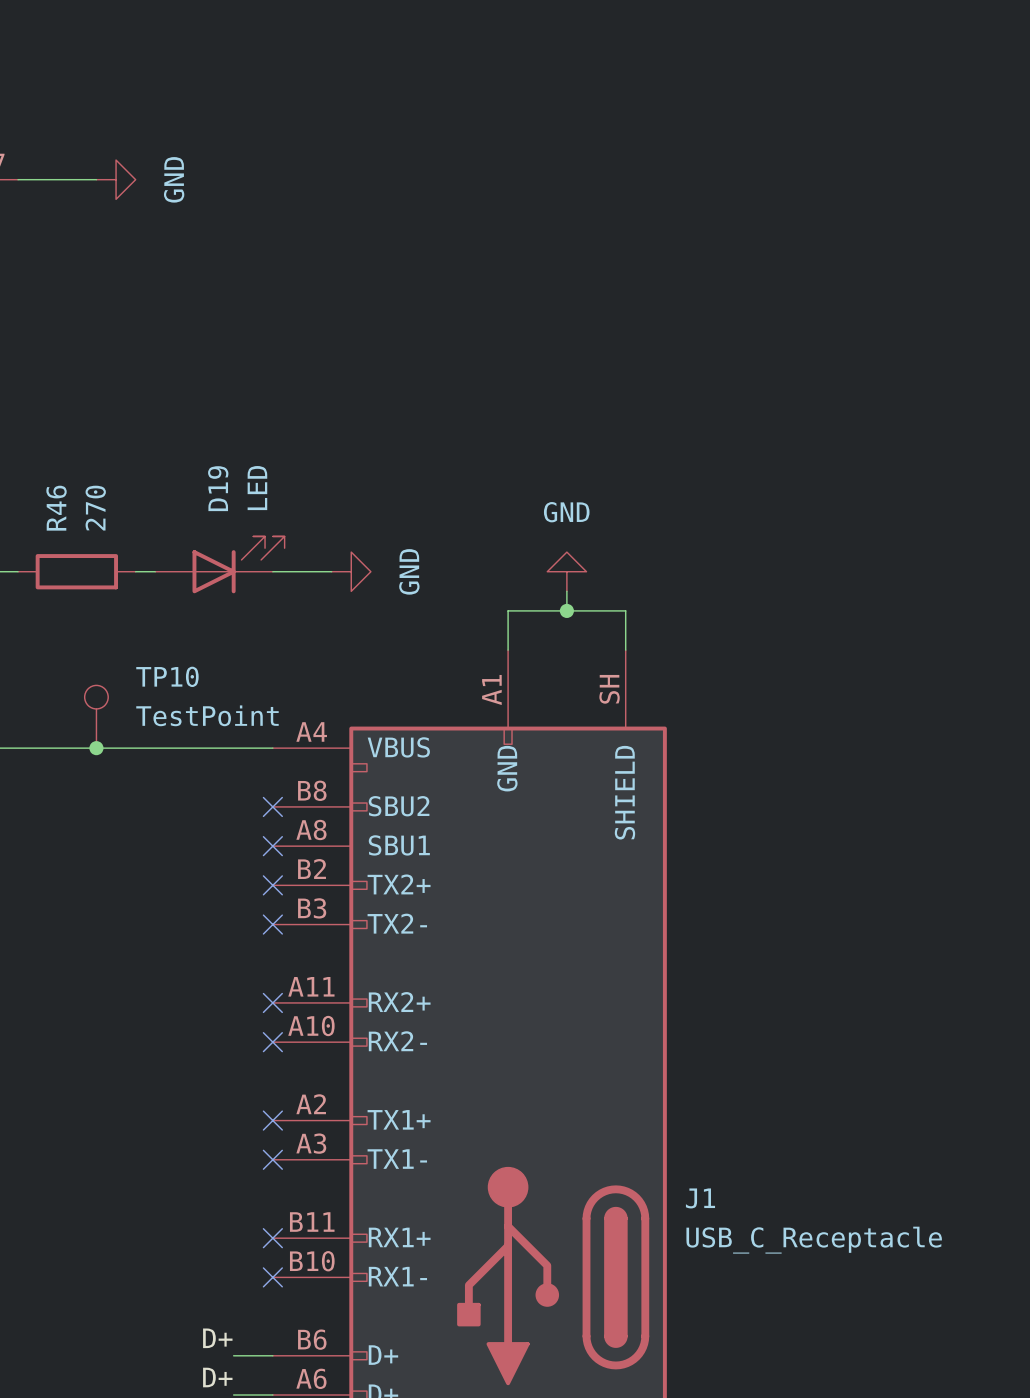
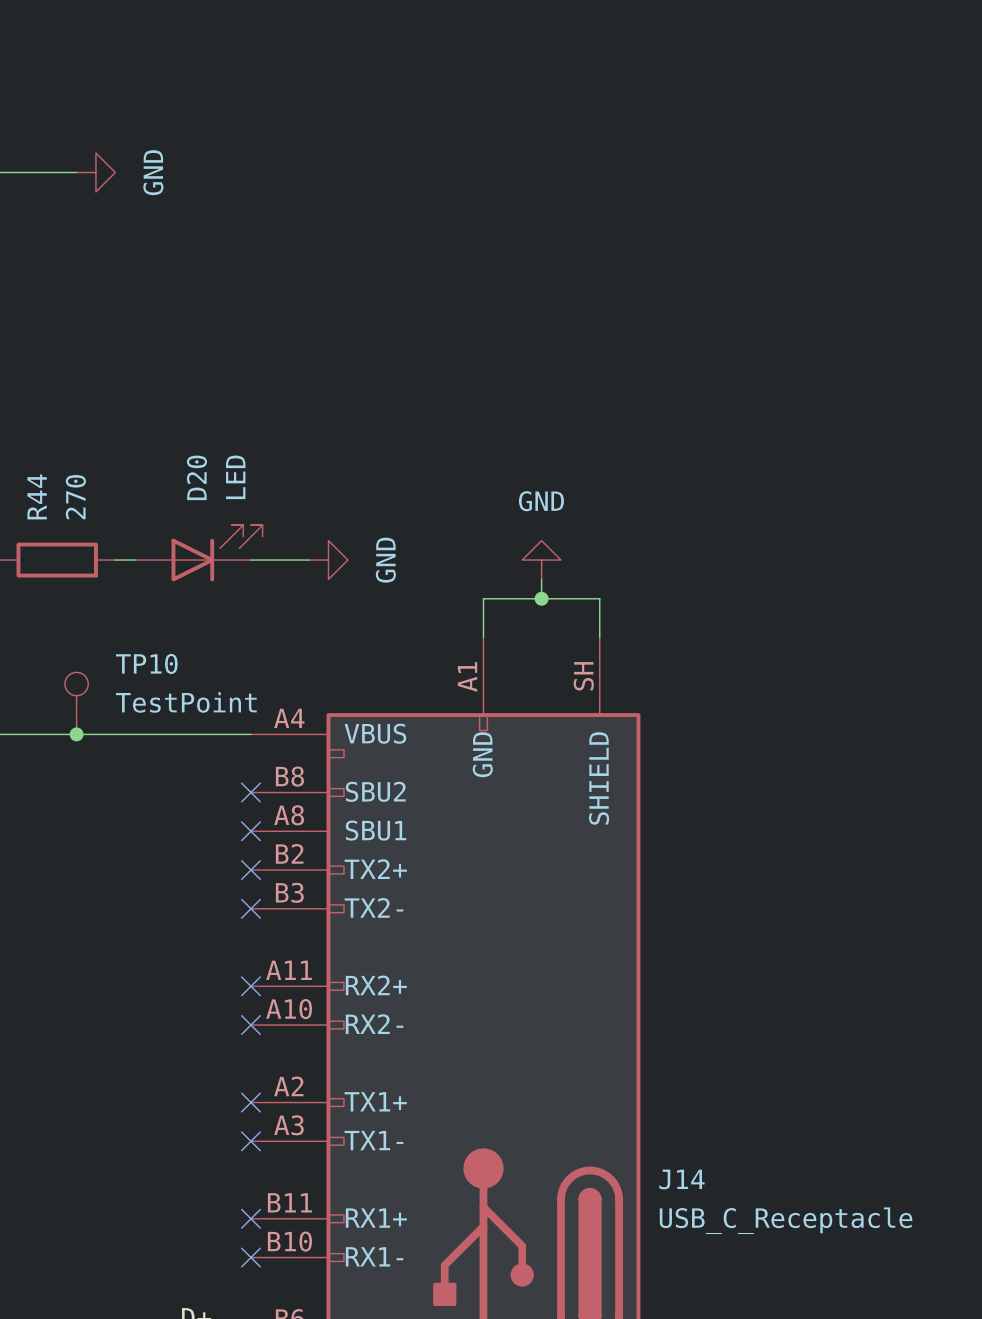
D19 name: D19 (218, 488) -> D20 (196, 477)
R46 name: R46 (56, 508) -> R44 (37, 496)
J1 name: J1 (700, 1198) -> J14 (681, 1179)

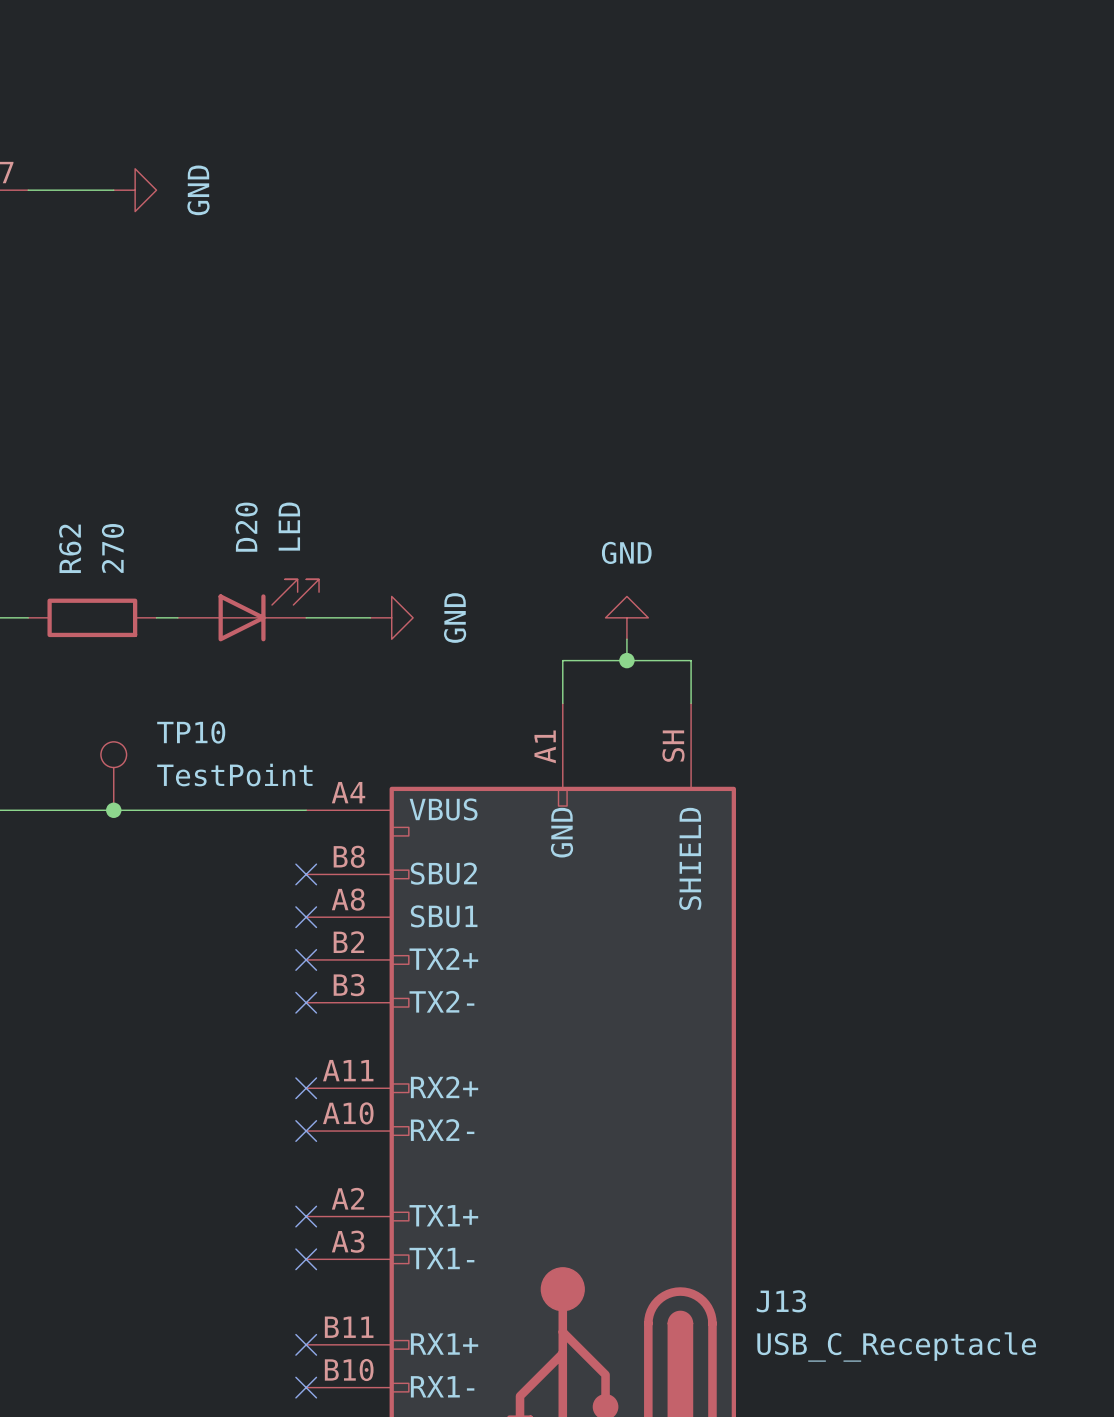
R44 name: R44 (37, 496) -> R62 (70, 548)
J14 name: J14 (681, 1179) -> J13 (781, 1301)

